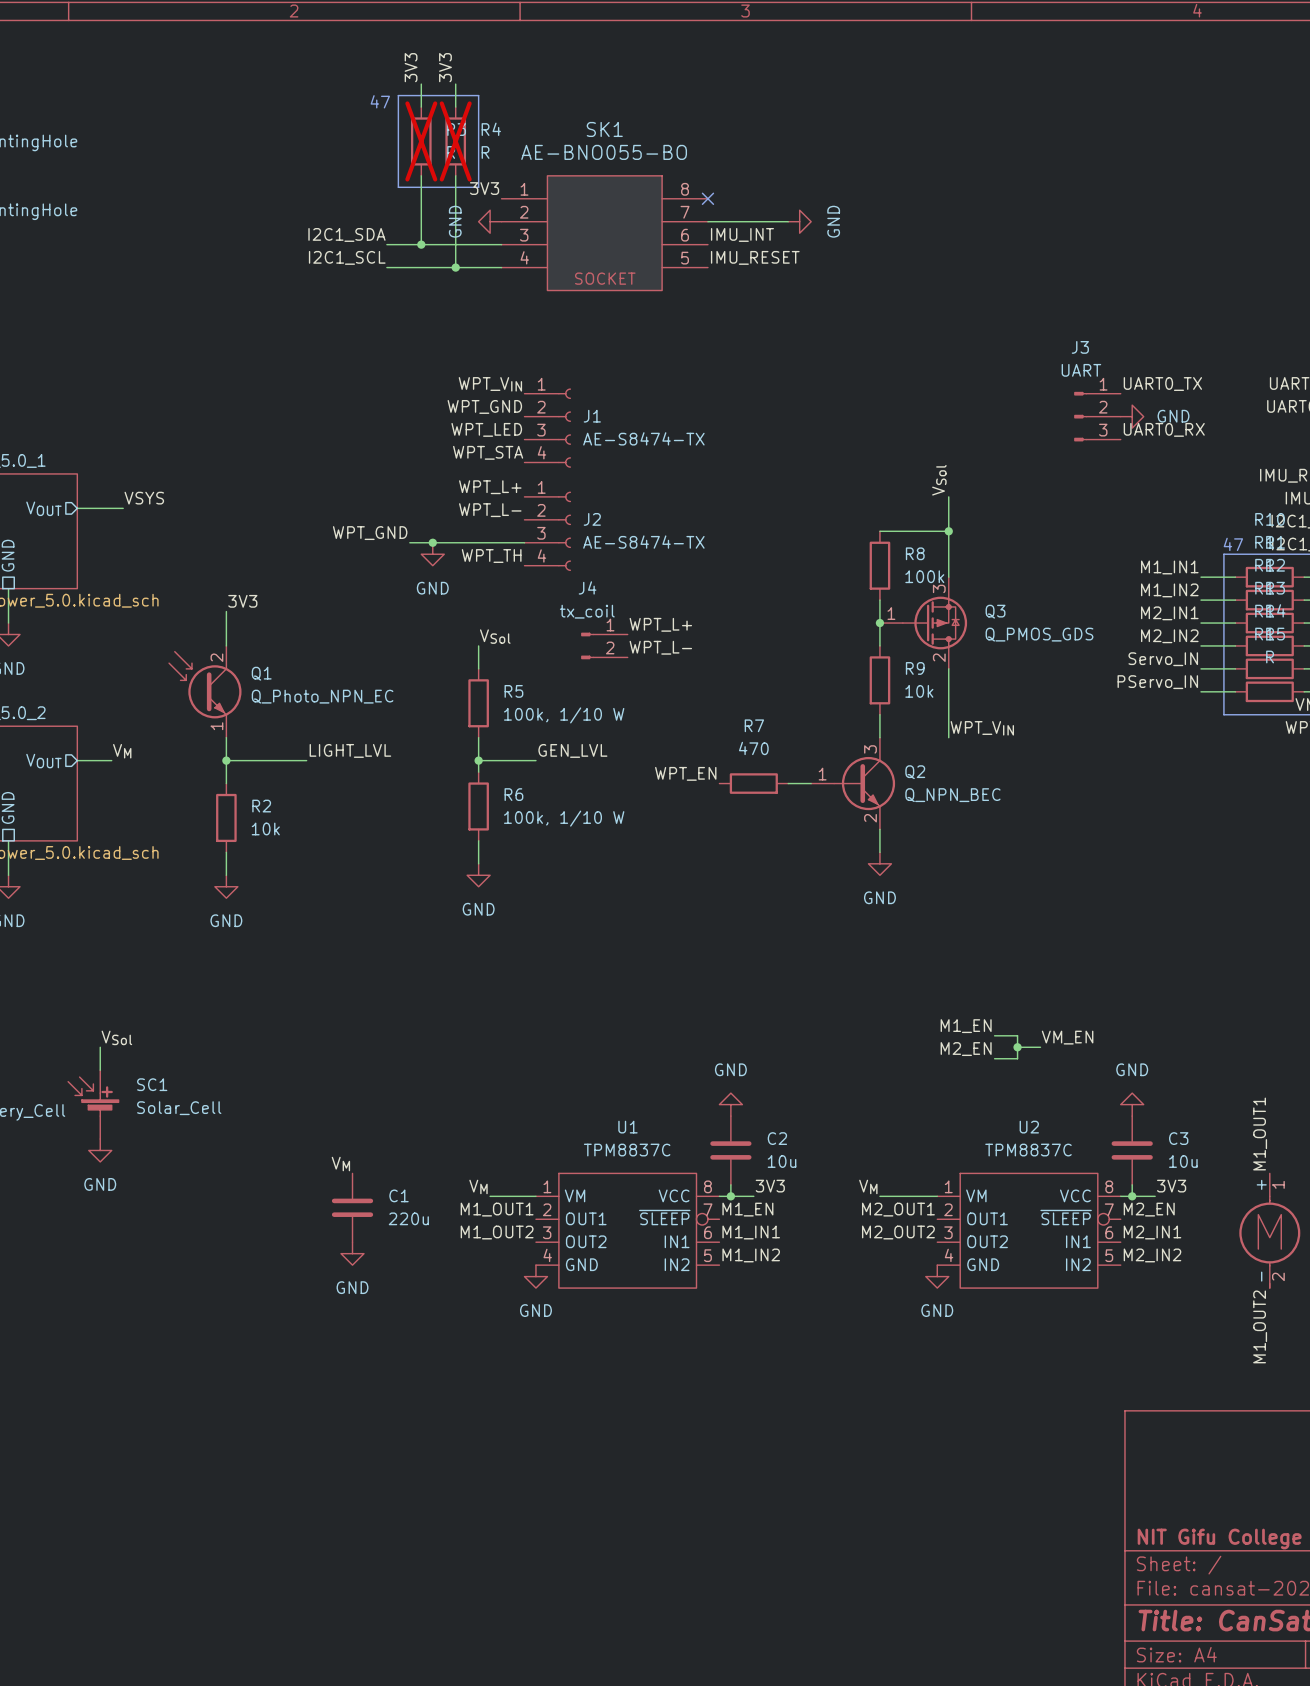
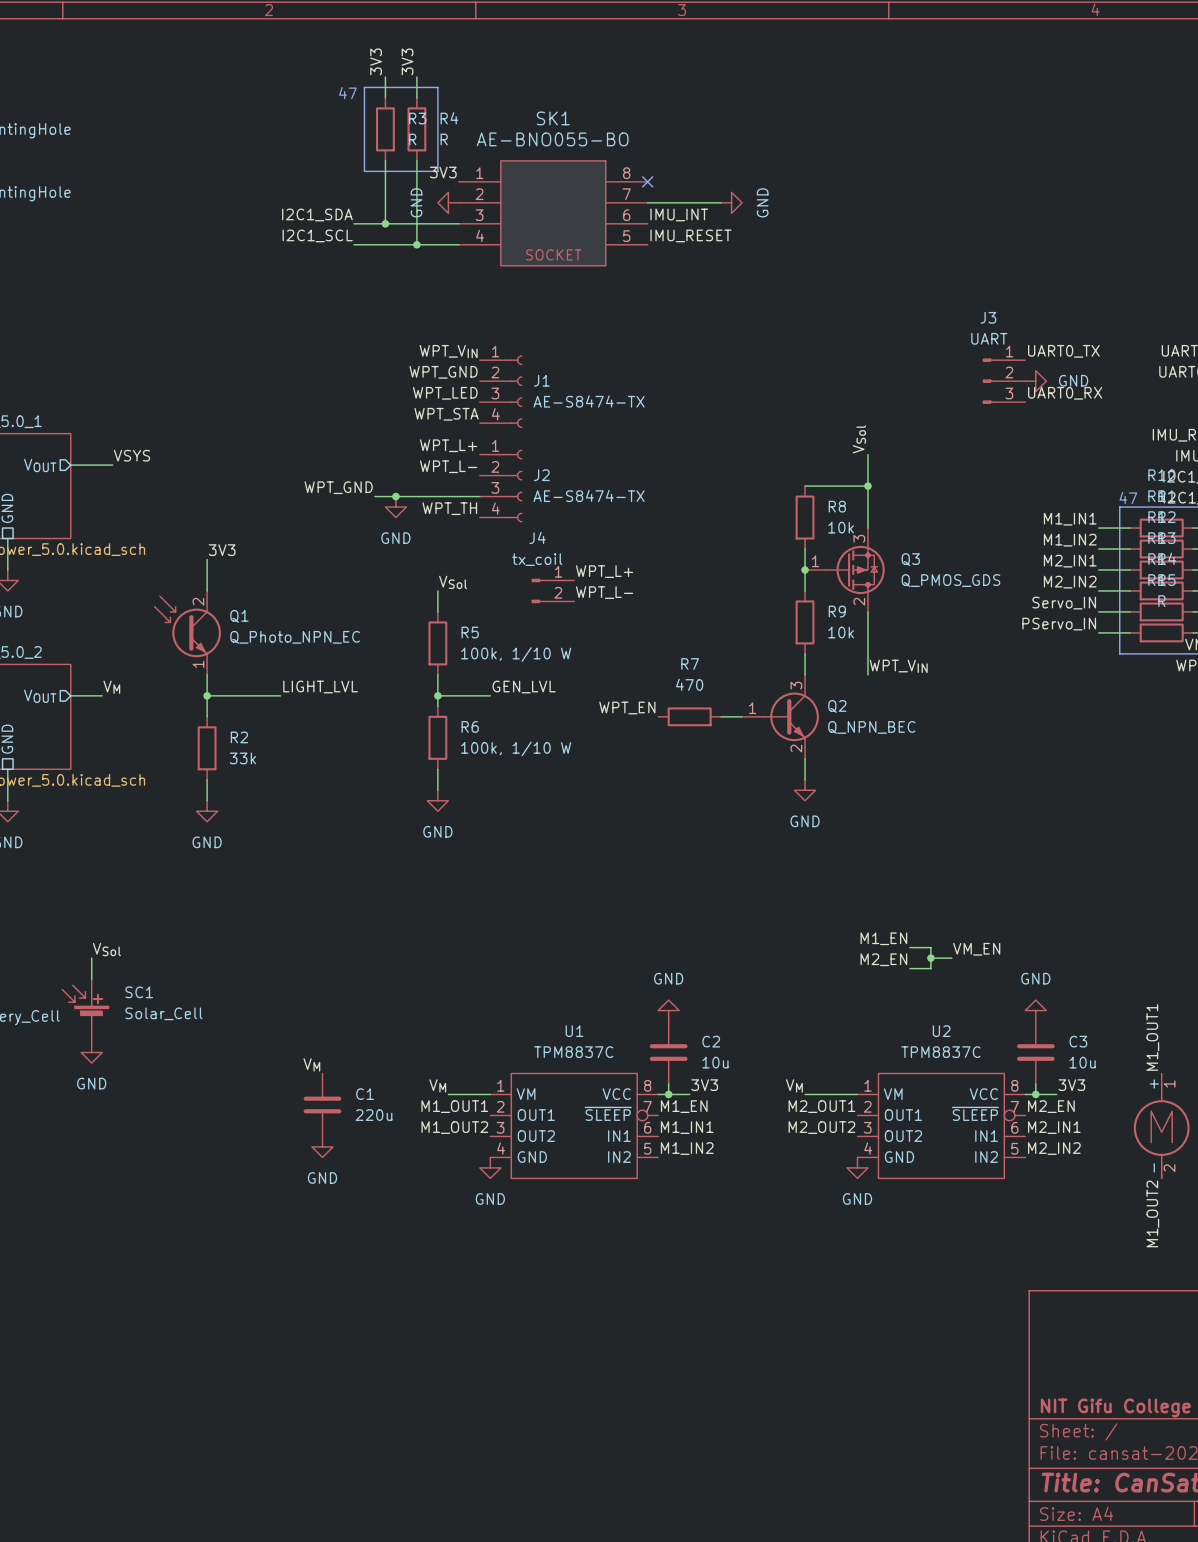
R3 do-not-place cross: (421, 141) -> none
R4 do-not-place cross: (455, 141) -> none
R8 value: 100k (924, 576) -> 10k (841, 527)
R2 value: 10k (265, 828) -> 33k (242, 758)

